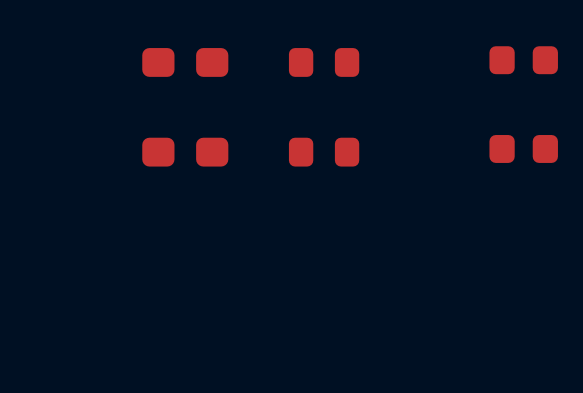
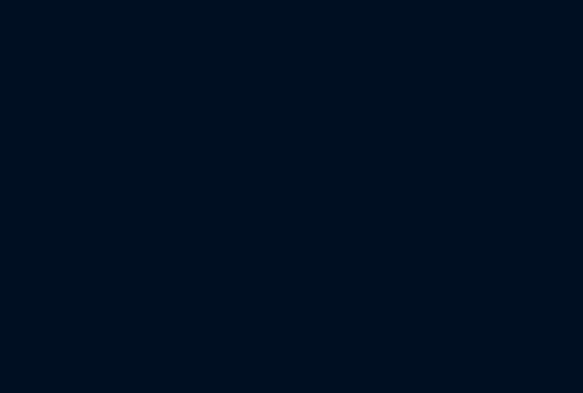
part: (523, 60) -> none
part: (185, 62) -> none
part: (324, 62) -> none
part: (523, 148) -> none
part: (185, 152) -> none
part: (324, 152) -> none

